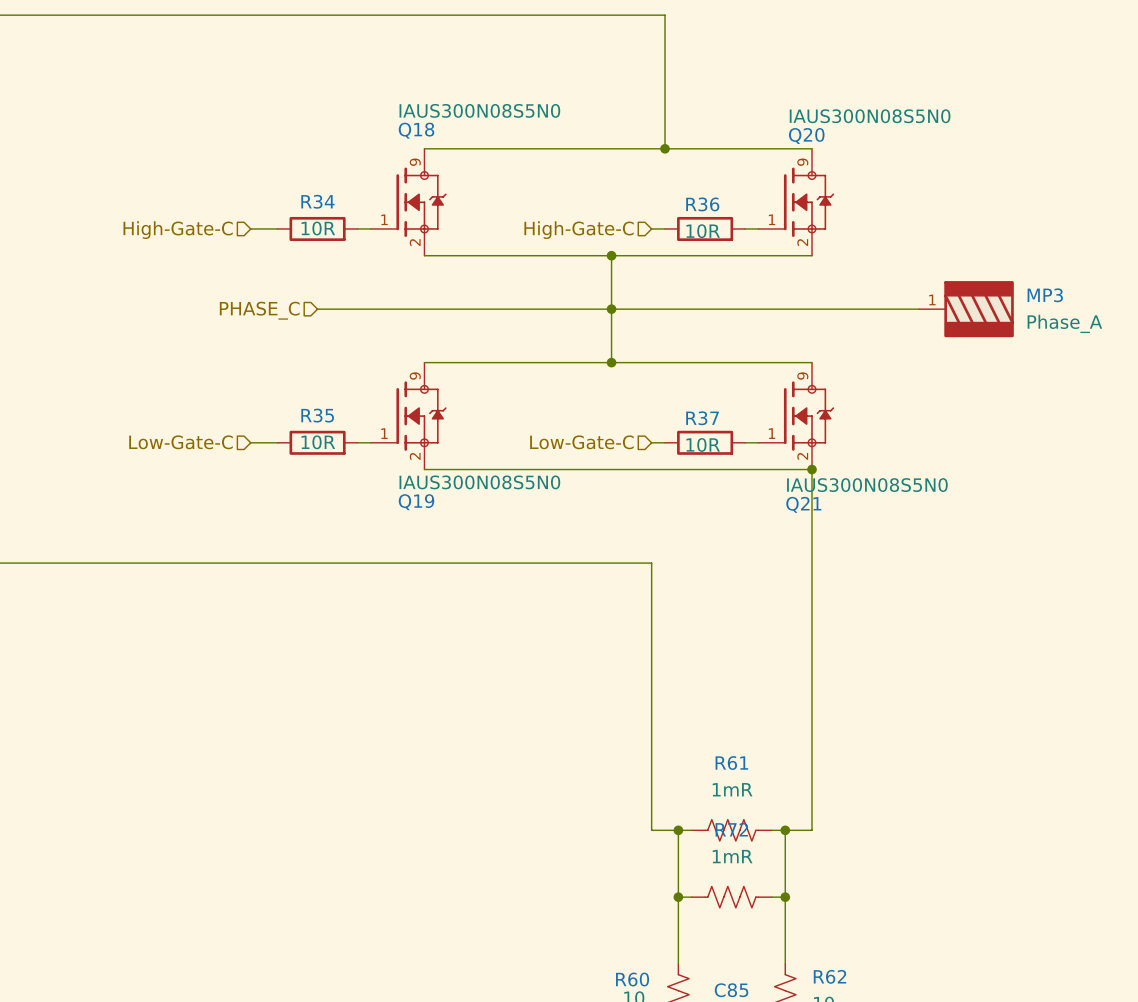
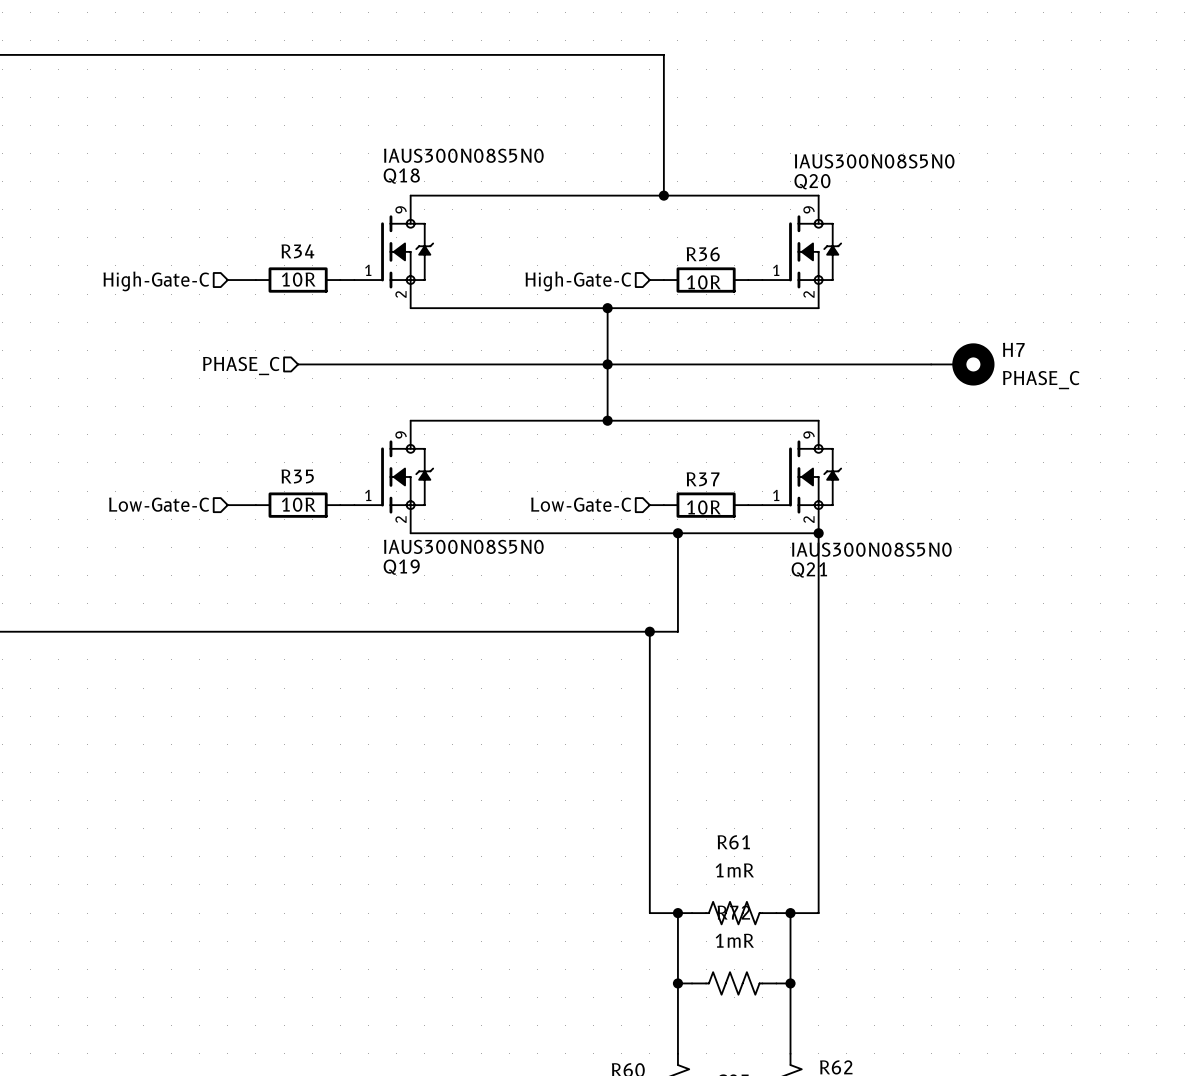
H7: none -> PHASE_C (962, 364)
MP3: Phase_A (966, 309) -> none
wire: none -> (677, 533) (677, 631) (649, 631)
junction: none -> (677, 533)
junction: none -> (649, 631)

